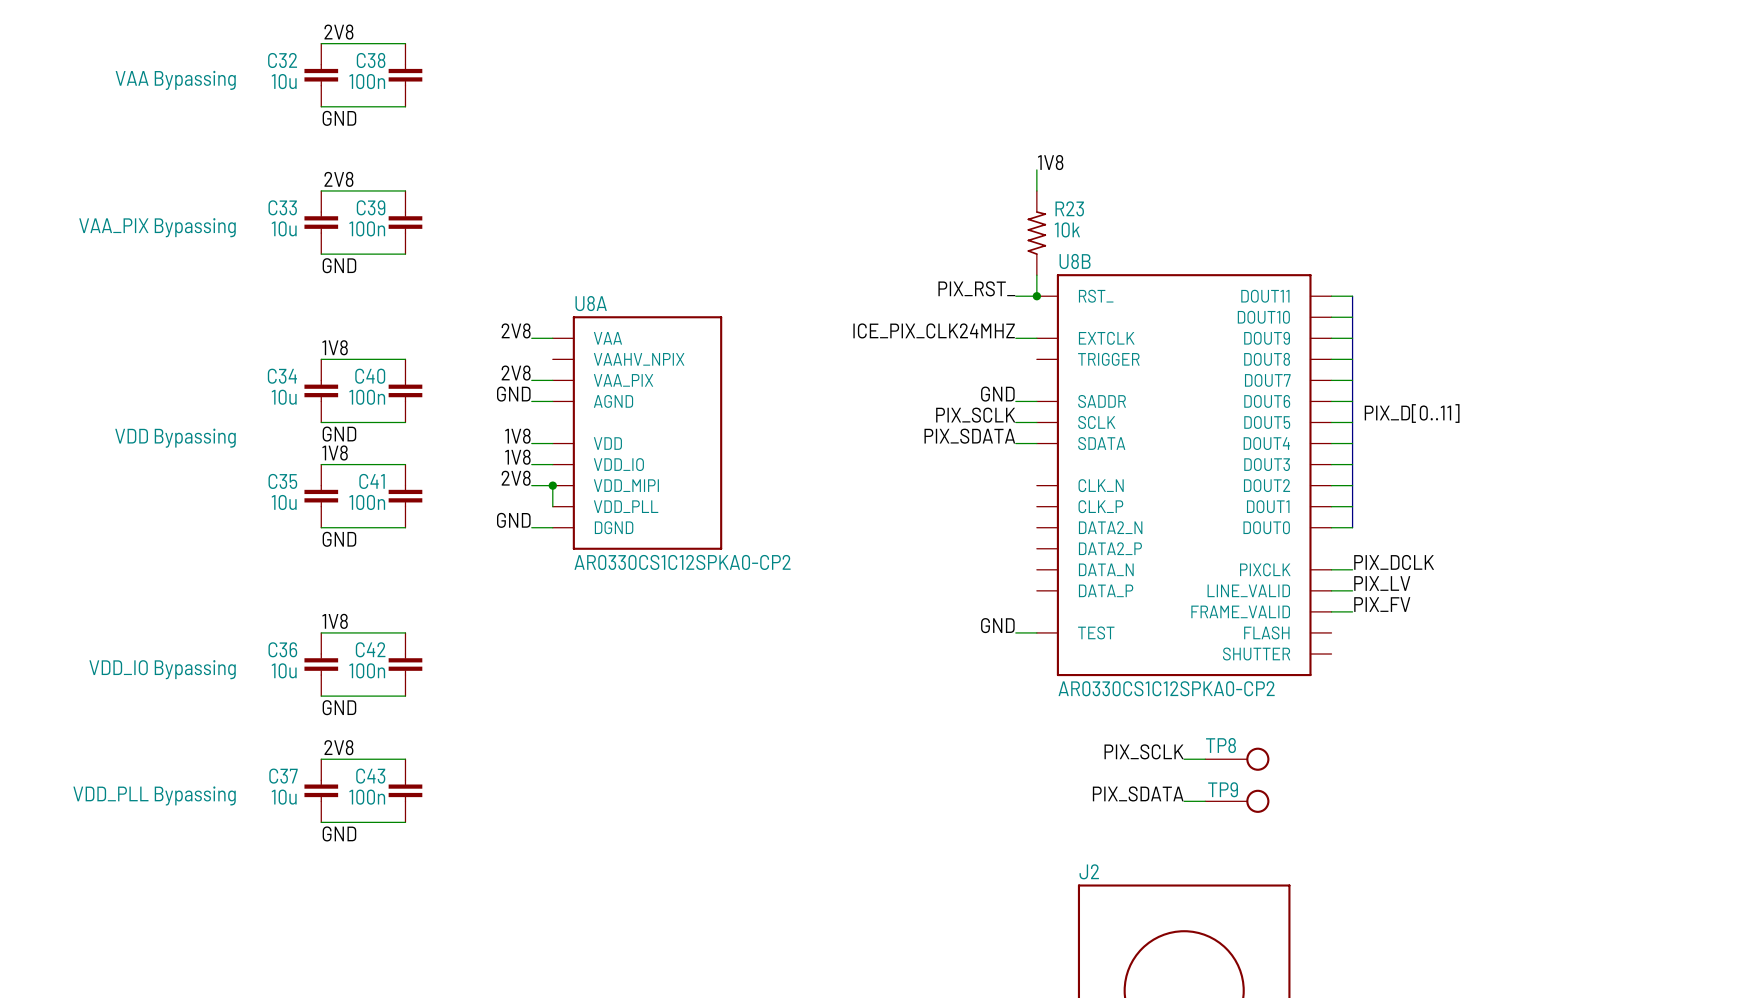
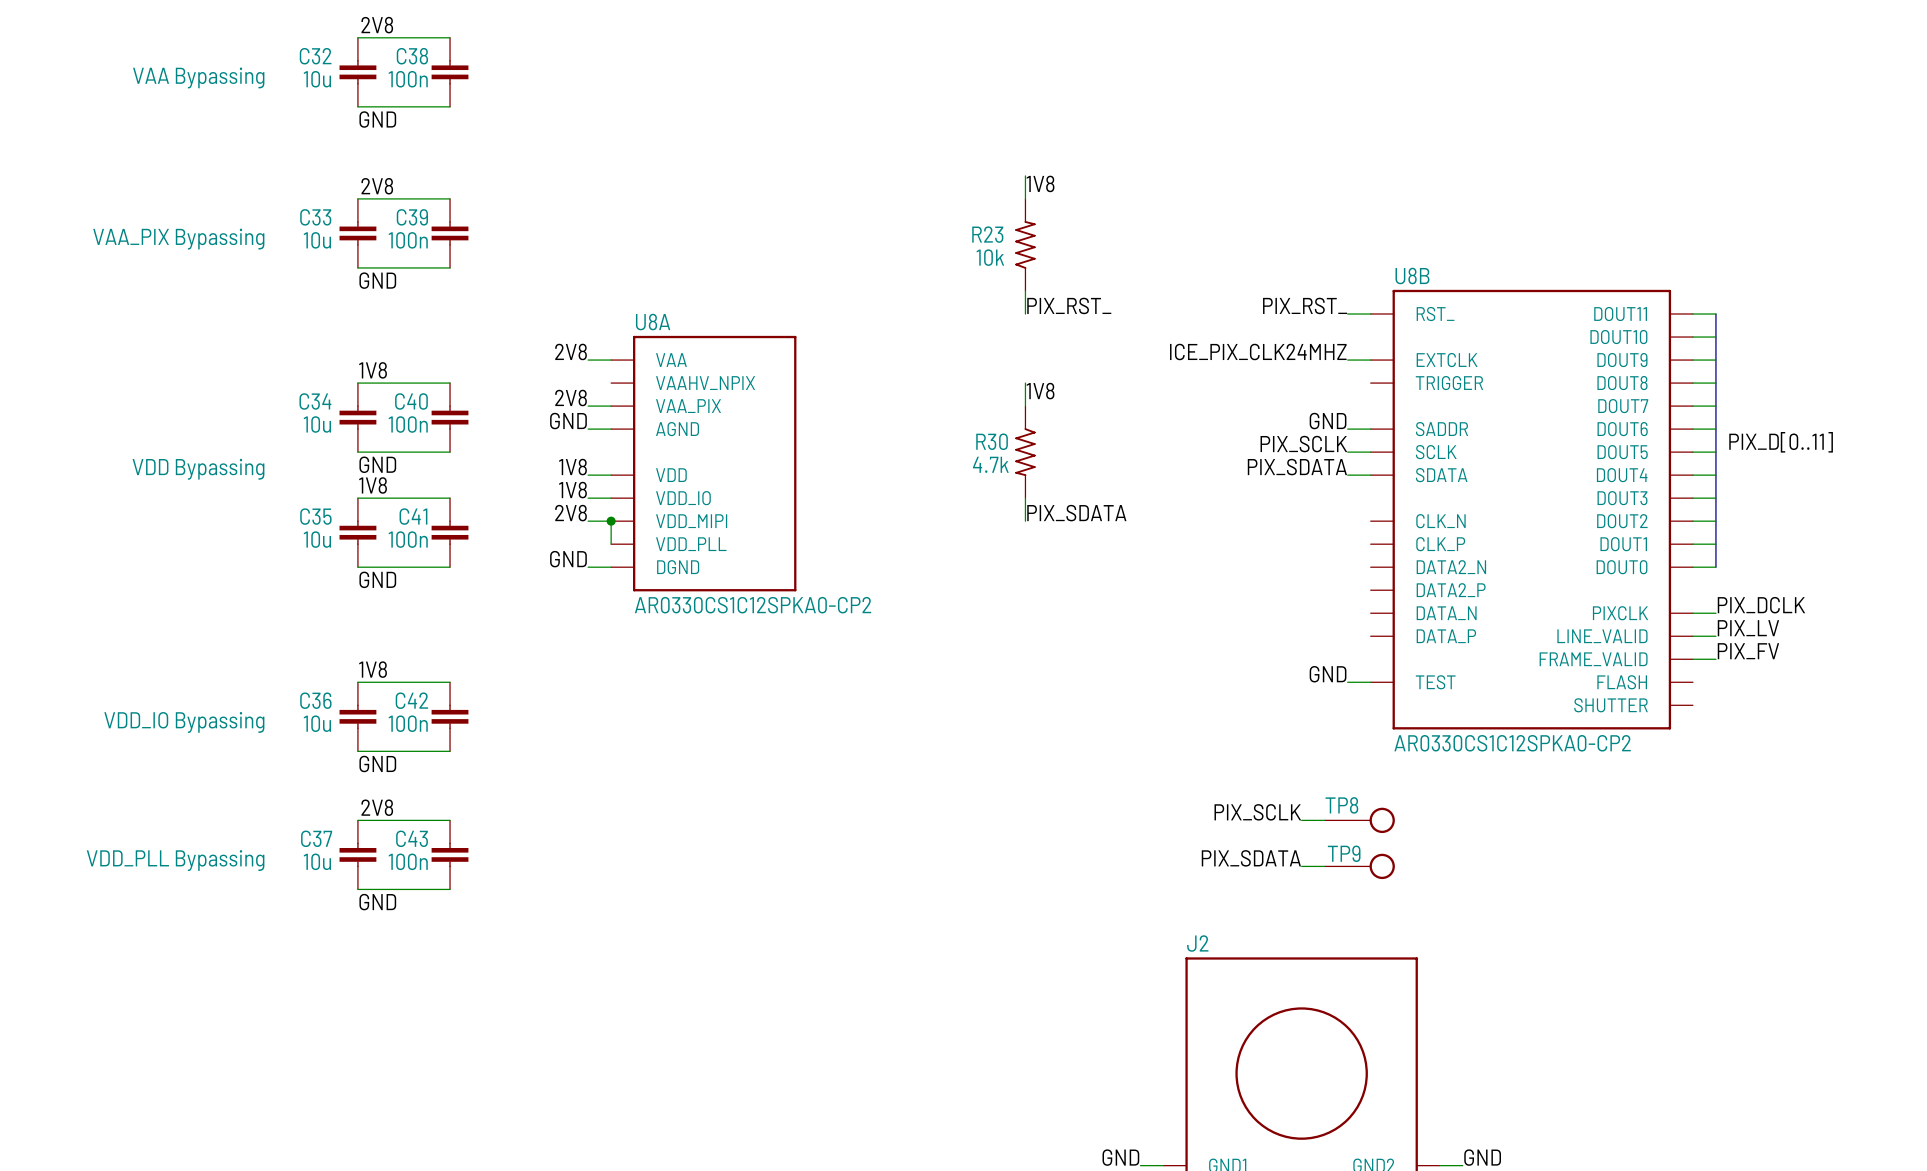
label position: 1V8 (1050, 162) -> 1V8 (1040, 183)
wire: (1036, 169) (1036, 190) -> (1025, 175) (1025, 198)
R23 name position: R23 (1069, 208) -> R23 (987, 234)
R23 value position: 10k (1067, 229) -> 10k (990, 257)
R23 position: (1036, 233) -> (1025, 244)
wire: none -> (1025, 290) (1025, 314)
wire: (1036, 275) (1036, 296) (1015, 296) -> none
label position: PIX_RST_ (976, 288) -> PIX_RST_ (1069, 305)
label: none -> PIX_RST_ (1305, 305)
junction: (1036, 296) -> none
wire: (1331, 296) (1352, 296) -> (1347, 314) (1370, 314)
bus: (1352, 296) (1352, 527) -> none
wire: none -> (1692, 314) (1715, 314)
bus: none -> (1715, 314) (1715, 567)
wire: (1331, 317) (1352, 317) -> none
wire: none -> (1692, 337) (1715, 337)
label: ICE_PIX_CLK24MHZ (934, 330) -> none
label: none -> ICE_PIX_CLK24MHZ (1258, 352)
wire: (1015, 338) (1036, 338) -> none
wire: (1331, 338) (1352, 338) -> (1347, 360) (1370, 360)
wire: none -> (1692, 360) (1715, 360)
wire: none -> (1025, 383) (1025, 406)
wire: none -> (1692, 383) (1715, 383)
label: none -> 1V8 (1040, 391)
wire: (1331, 380) (1352, 380) -> none
wire: none -> (1692, 406) (1715, 406)
label: GND (997, 394) -> none
label: none -> GND (1328, 421)
wire: (1015, 401) (1036, 401) -> none
wire: (1331, 401) (1352, 401) -> (1347, 429) (1370, 429)
wire: none -> (1692, 429) (1715, 429)
label: PIX_D[0..11] (1412, 413) -> none
label: none -> PIX_D[0..11] (1781, 442)
label: PIX_SCLK (975, 415) -> none
label: none -> PIX_SCLK (1303, 444)
R30: none -> 4.7k (1025, 452)
wire: (1015, 422) (1036, 422) -> none
wire: (1331, 422) (1352, 422) -> (1347, 452) (1370, 452)
wire: none -> (1692, 452) (1715, 452)
label position: PIX_SDATA (969, 436) -> PIX_SDATA (1076, 513)
label: none -> PIX_SDATA (1297, 467)
wire: (1015, 443) (1036, 443) -> none
wire: (1331, 443) (1352, 443) -> (1347, 475) (1370, 475)
wire: none -> (1692, 475) (1715, 475)
wire: none -> (1025, 498) (1025, 521)
wire: (1331, 464) (1352, 464) -> none
wire: none -> (1692, 498) (1715, 498)
U8B position: (1184, 475) -> (1531, 509)
wire: (1331, 485) (1352, 485) -> none
wire: none -> (1692, 521) (1715, 521)
wire: (1331, 506) (1352, 506) -> none
wire: none -> (1692, 544) (1715, 544)
wire: (1331, 527) (1352, 527) -> none
wire: none -> (1692, 567) (1715, 567)
label: PIX_DCLK (1394, 562) -> none
label: none -> PIX_DCLK (1761, 605)
wire: (1331, 569) (1352, 569) -> none
wire: none -> (1692, 613) (1715, 613)
label: PIX_LV (1382, 583) -> none
label: none -> PIX_LV (1748, 628)
wire: (1331, 590) (1352, 590) -> none
wire: none -> (1692, 636) (1715, 636)
label: PIX_FV (1382, 604) -> none
label: none -> PIX_FV (1748, 651)
wire: (1331, 611) (1352, 611) -> (1347, 682) (1370, 682)
wire: none -> (1692, 659) (1715, 659)
label: GND (997, 625) -> none
label: none -> GND (1328, 674)
wire: (1015, 632) (1036, 632) -> none

